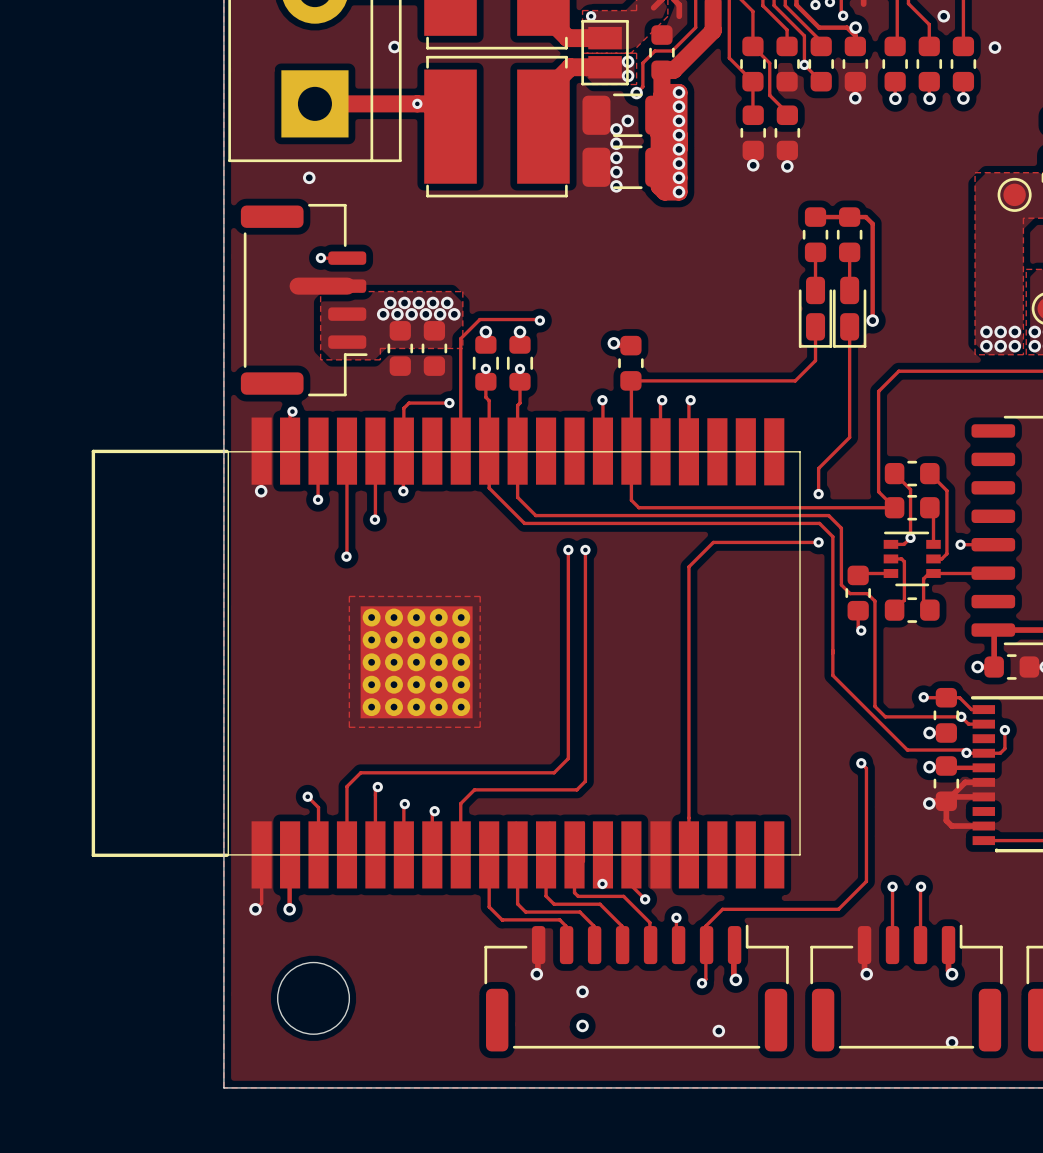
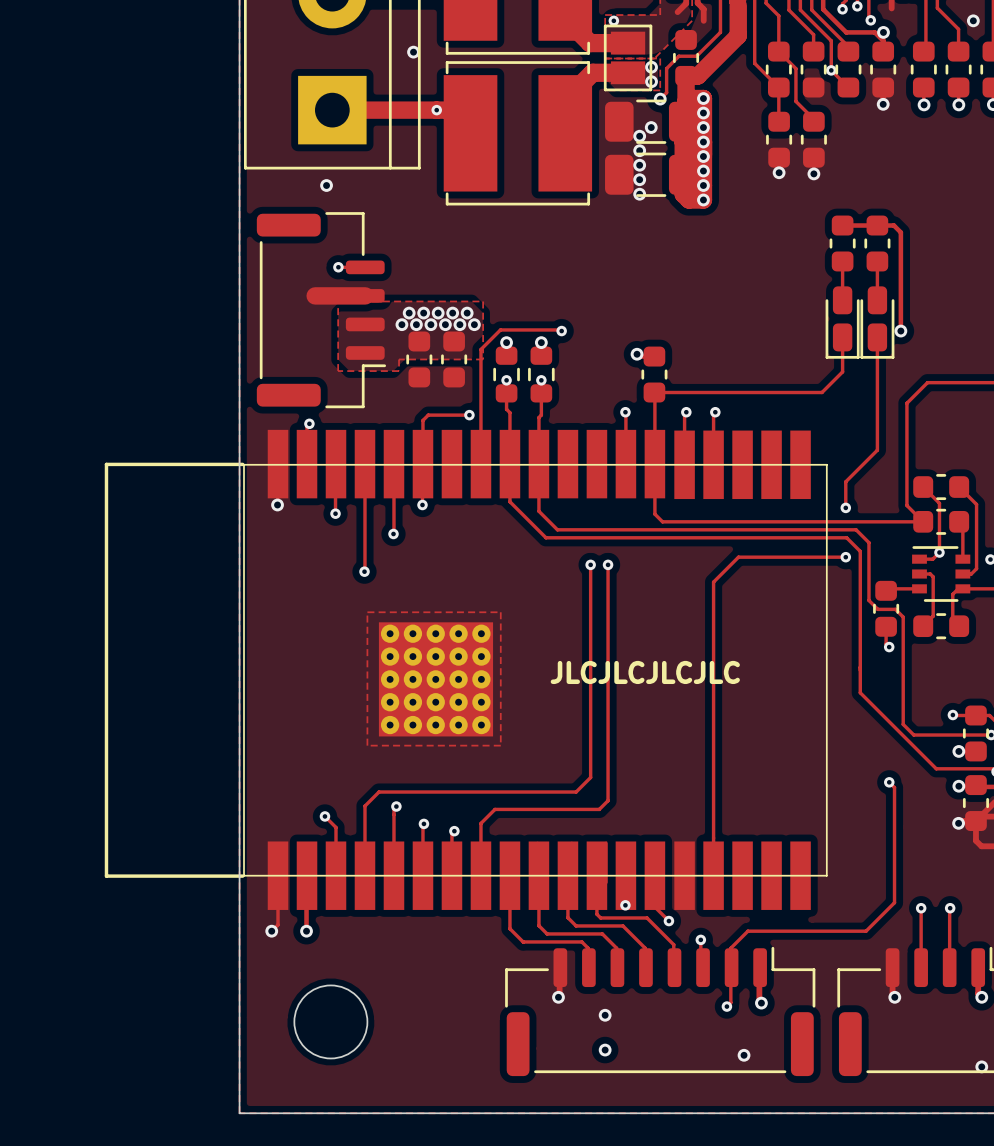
text: none -> JLCJLCJLCJLC (645, 672)

